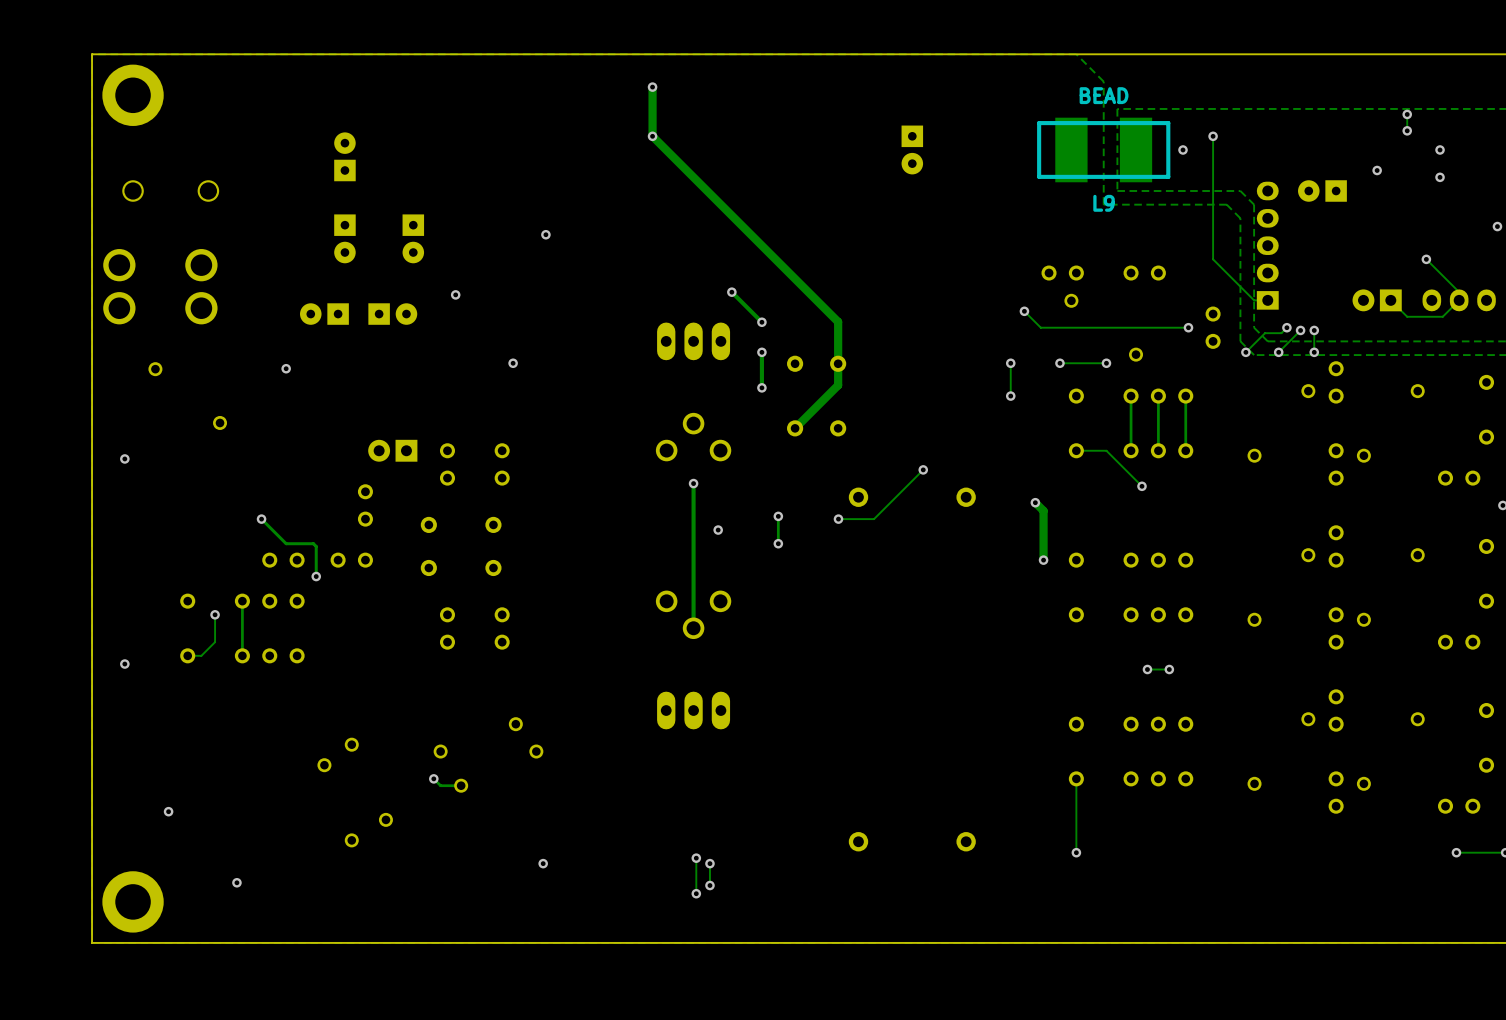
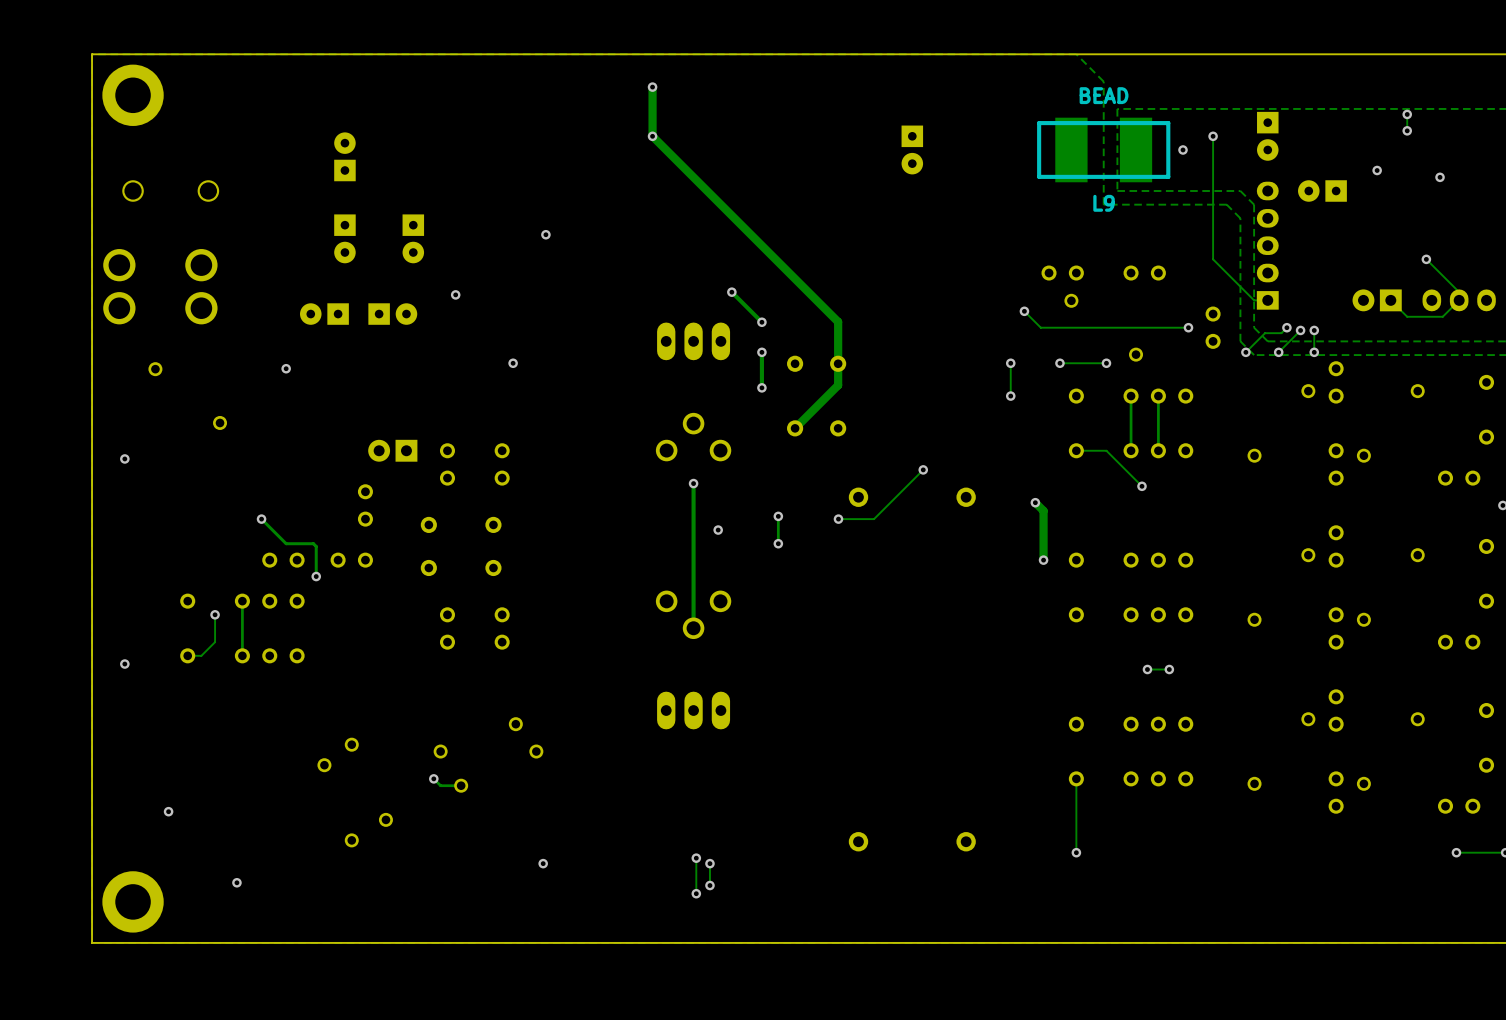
part: none -> (1267, 136)
via: (1440, 149) -> none
via: (1497, 226) -> none
track: (1185, 396) (1185, 450) -> none

